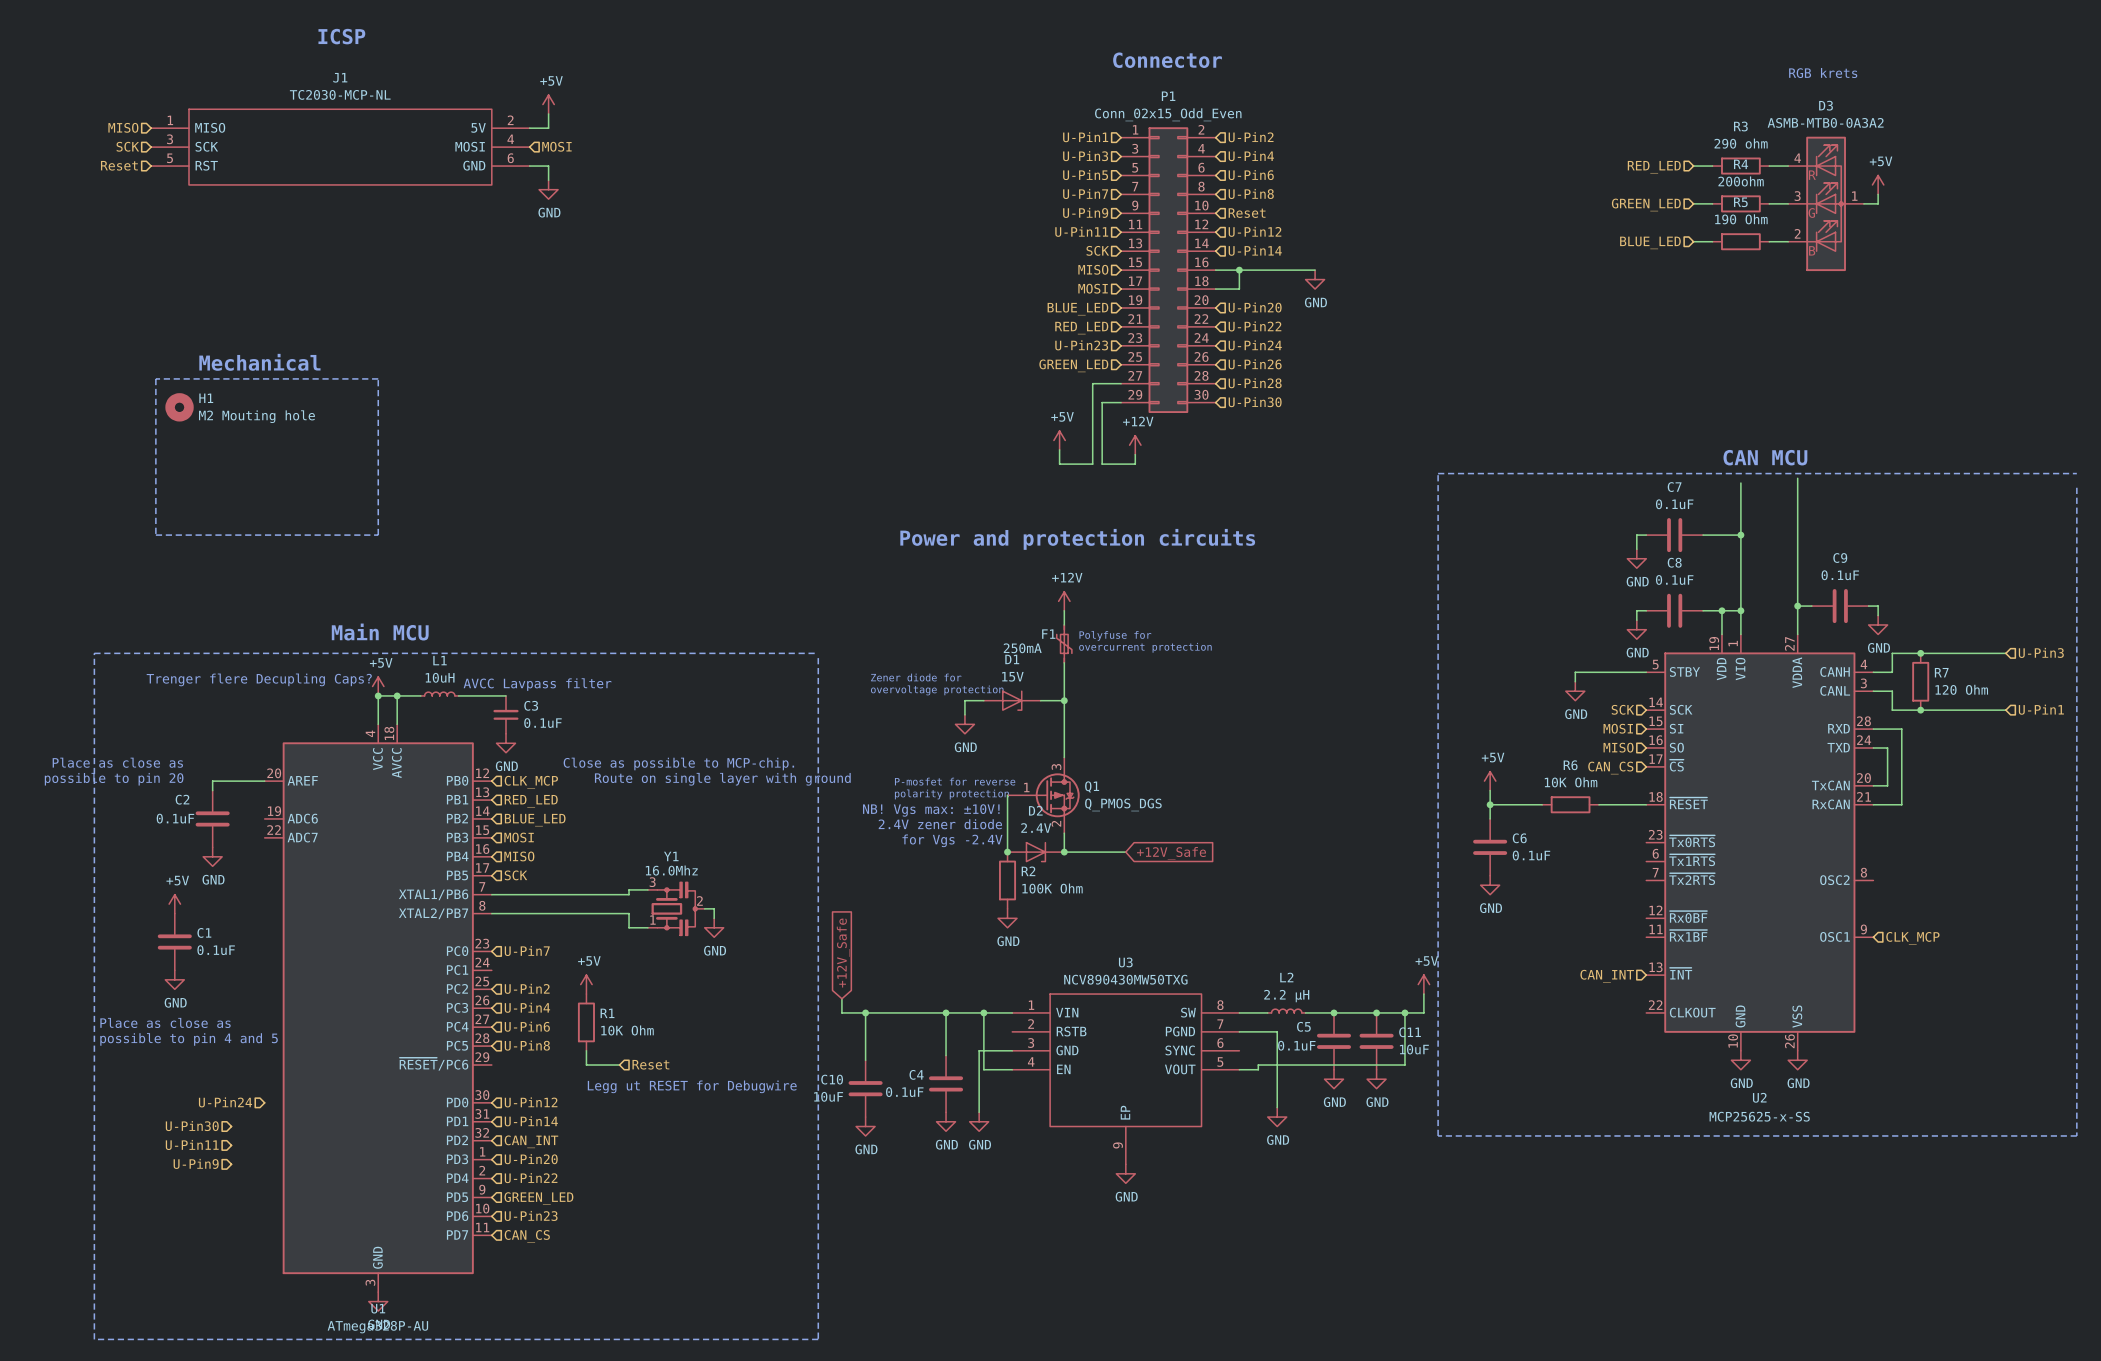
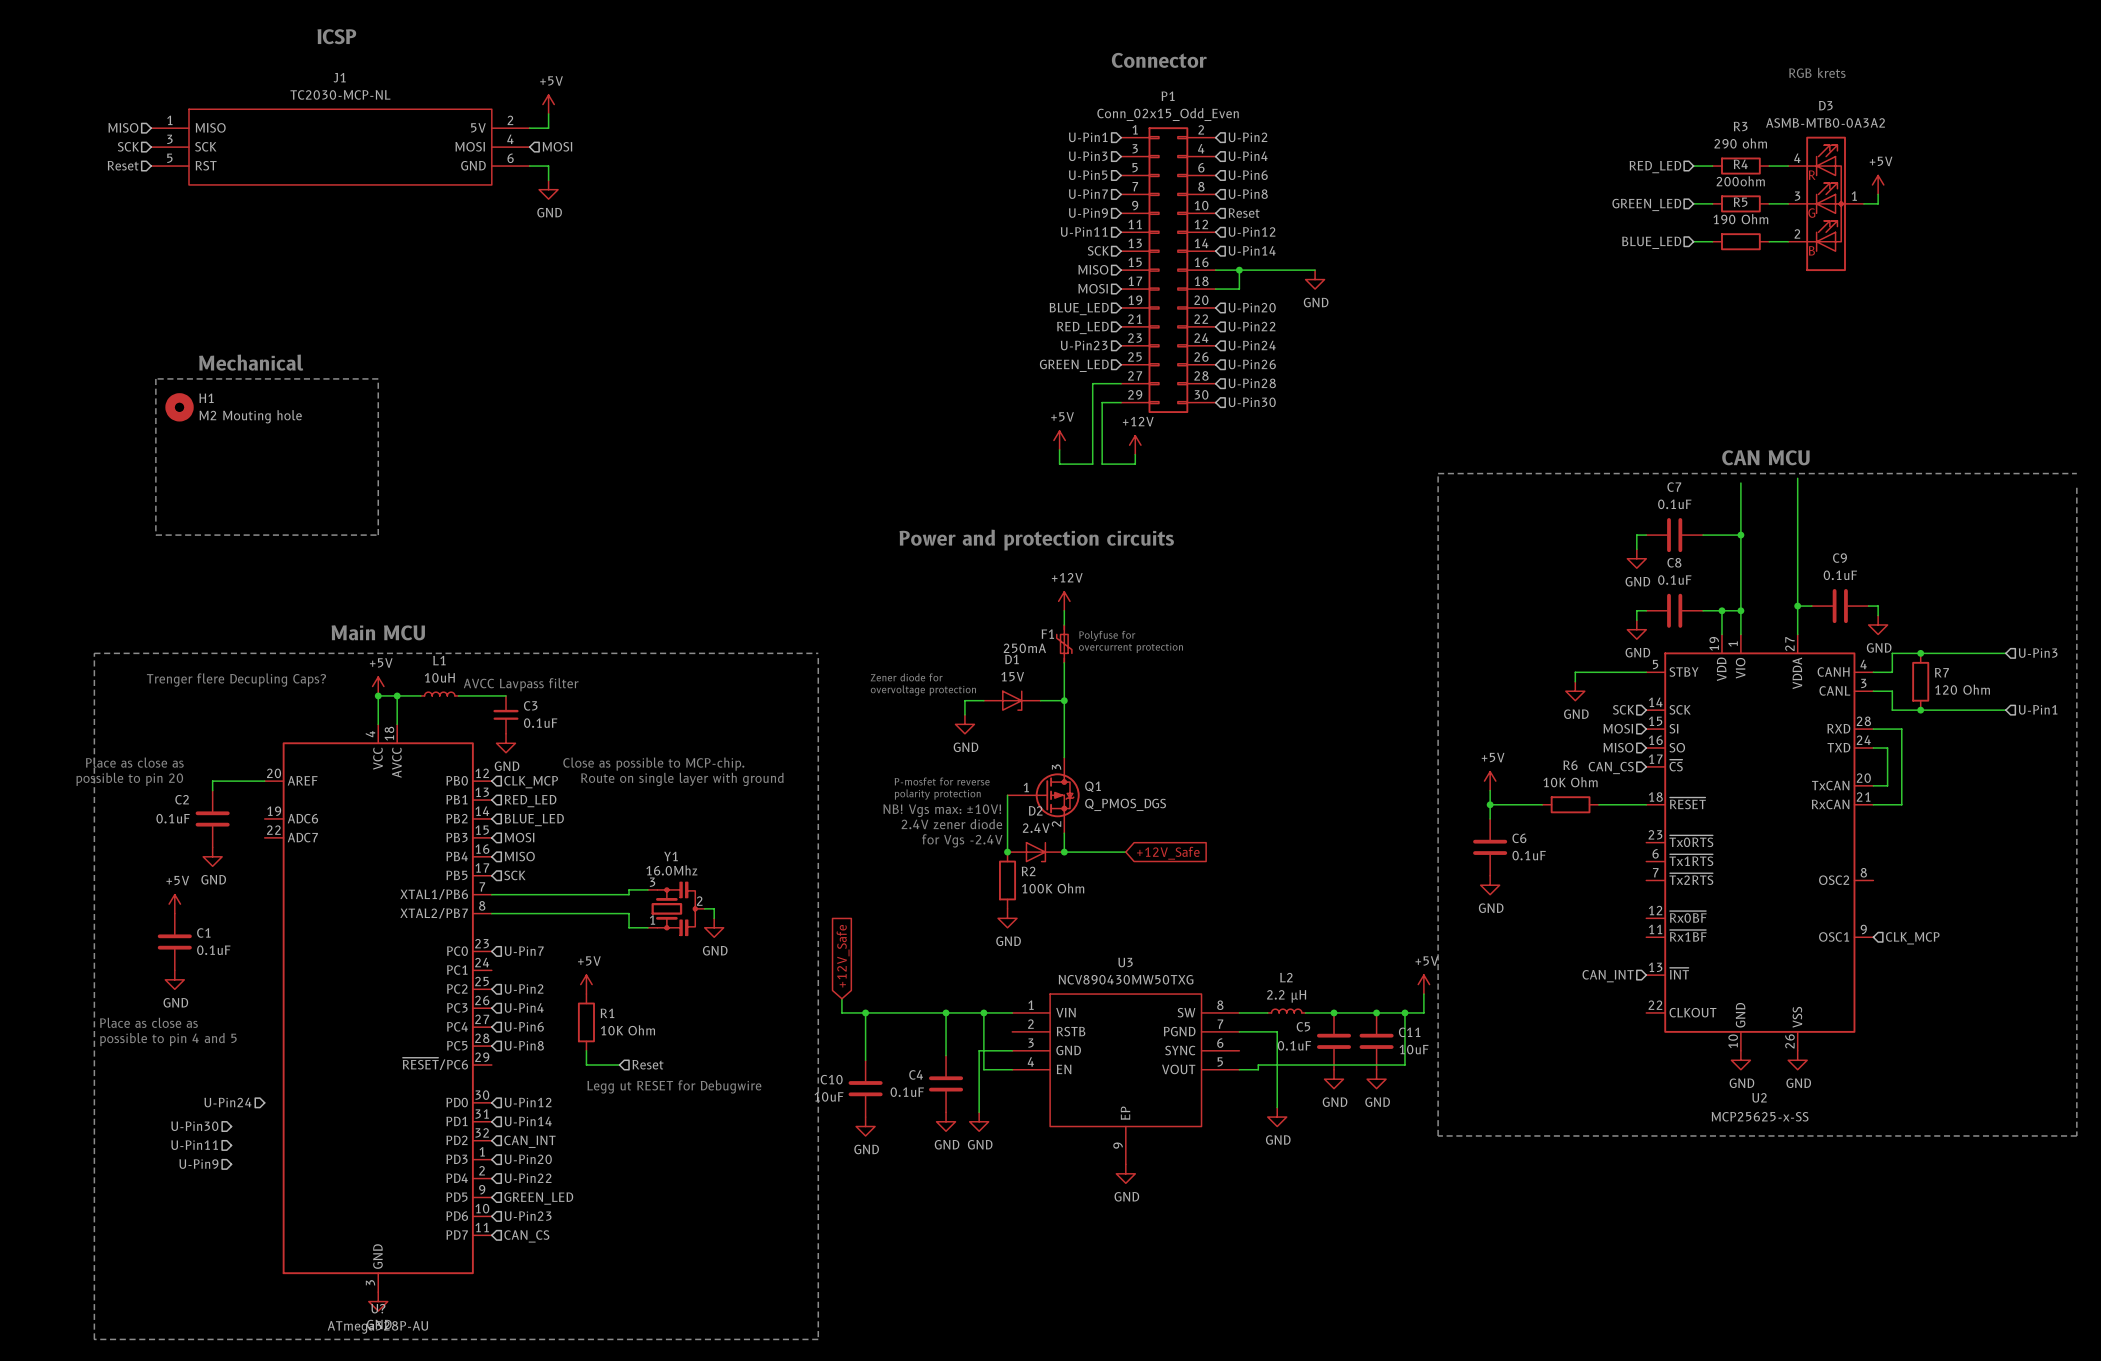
U1 name: U1 (378, 1308) -> U? (378, 1308)

